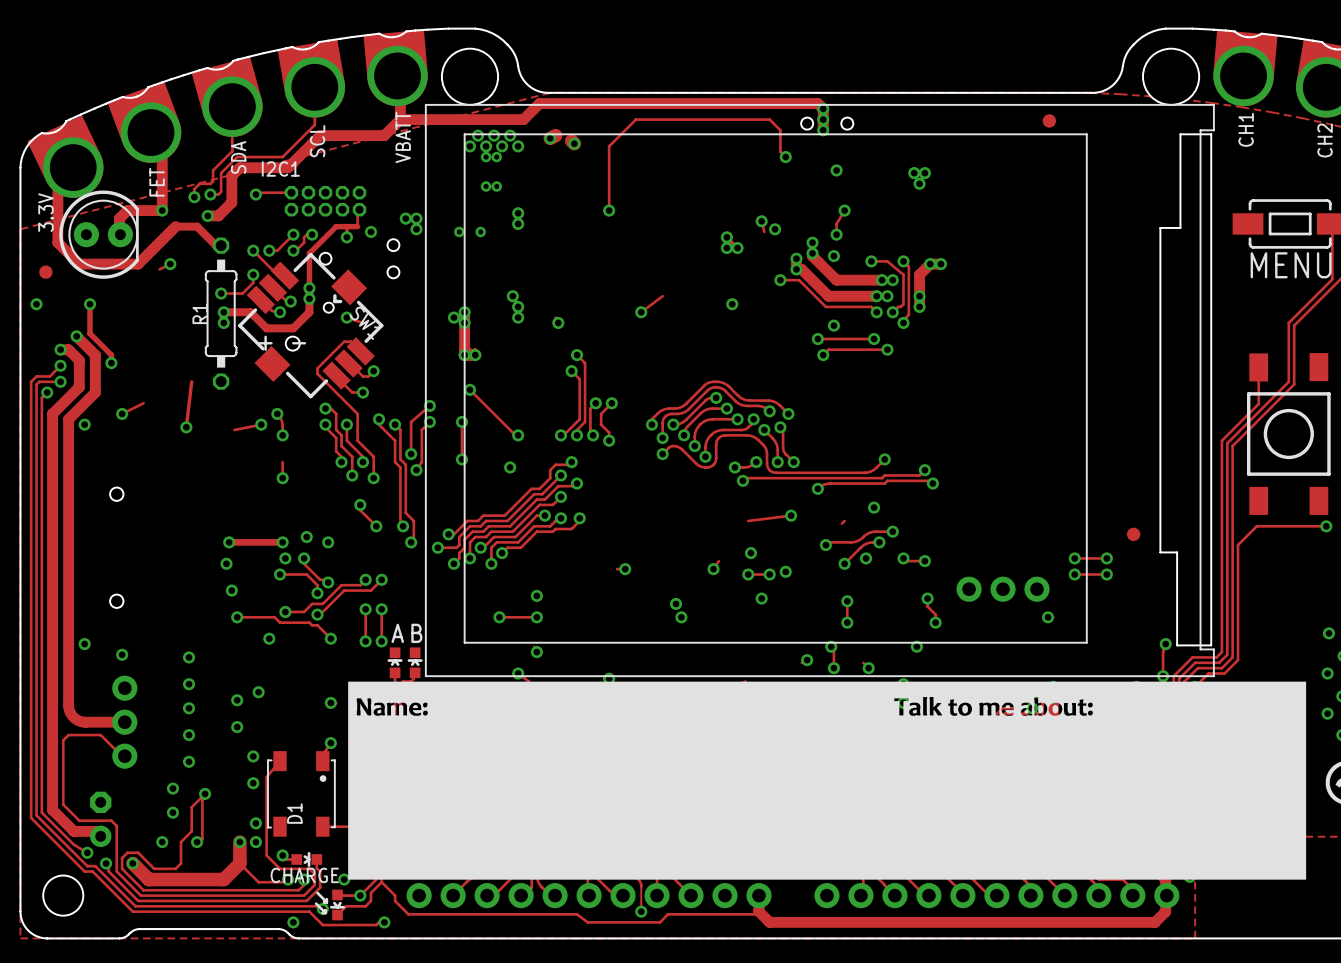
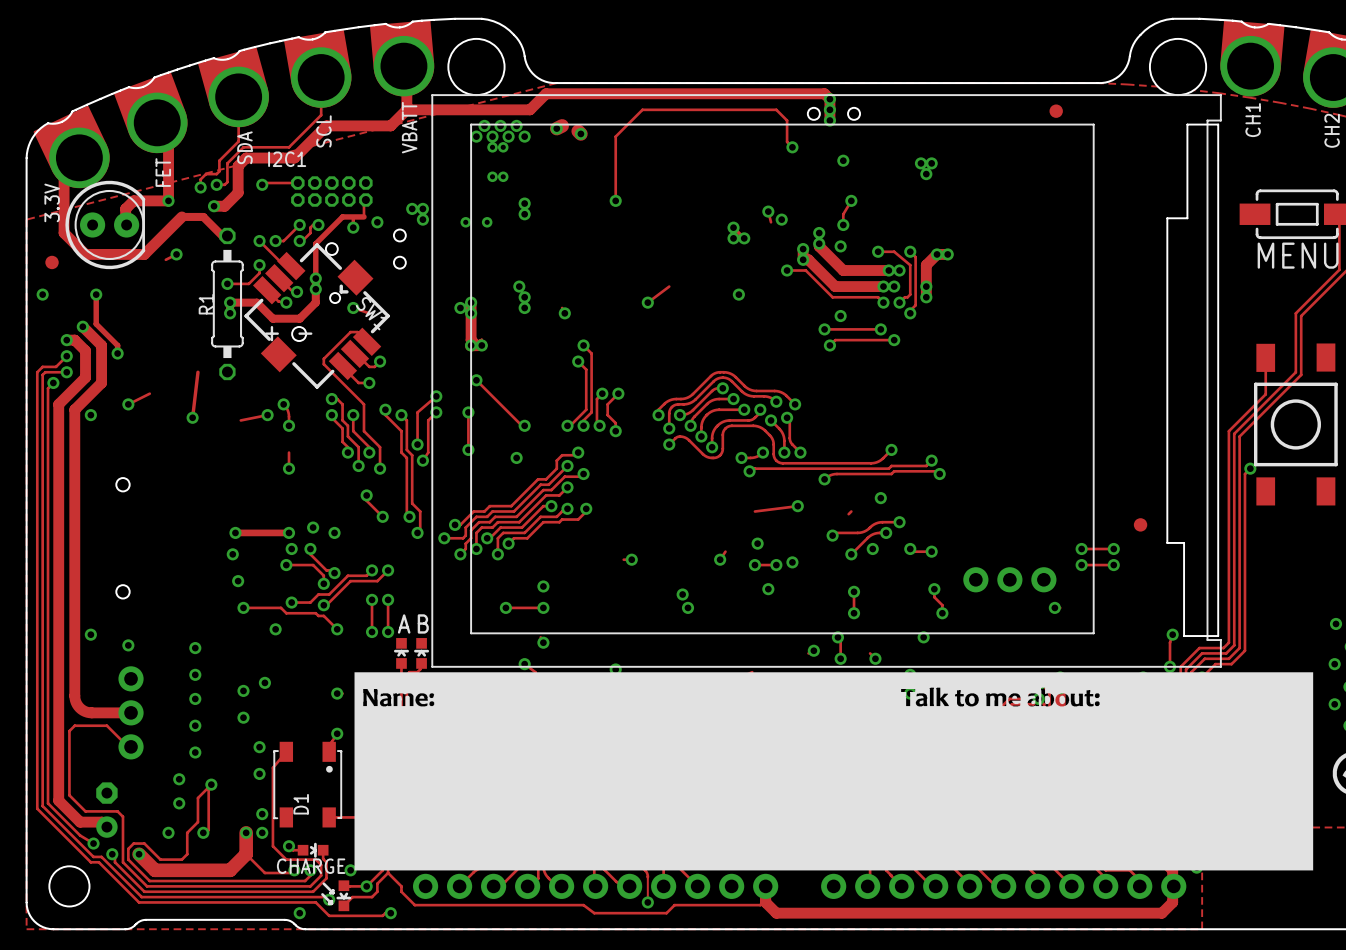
via: none -> (1250, 468)
track: (1326, 526) (1256, 526) (1237, 545) -> (1250, 468) (1244, 474) (1244, 535)
via: (1326, 526) -> none

